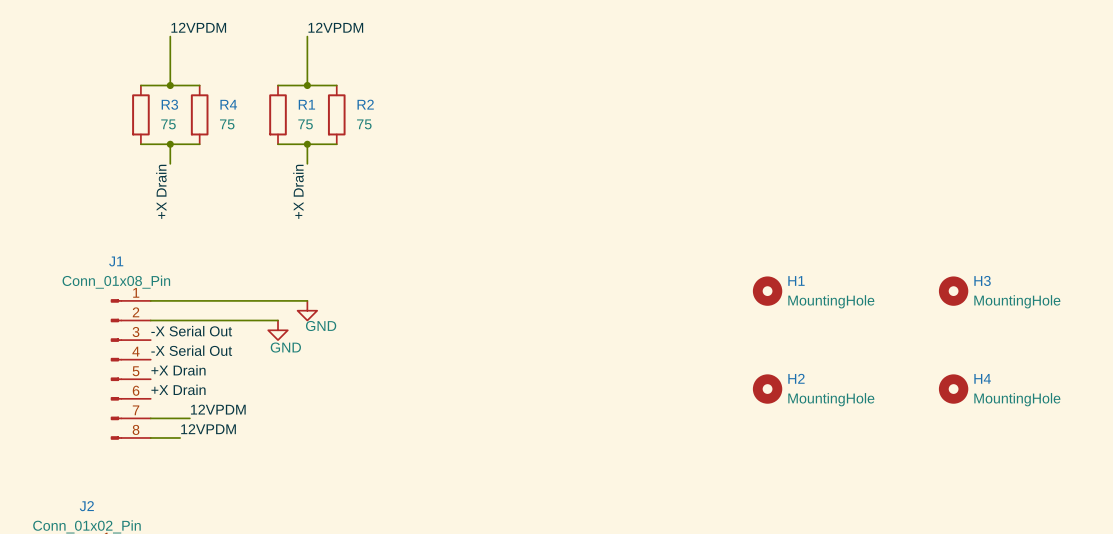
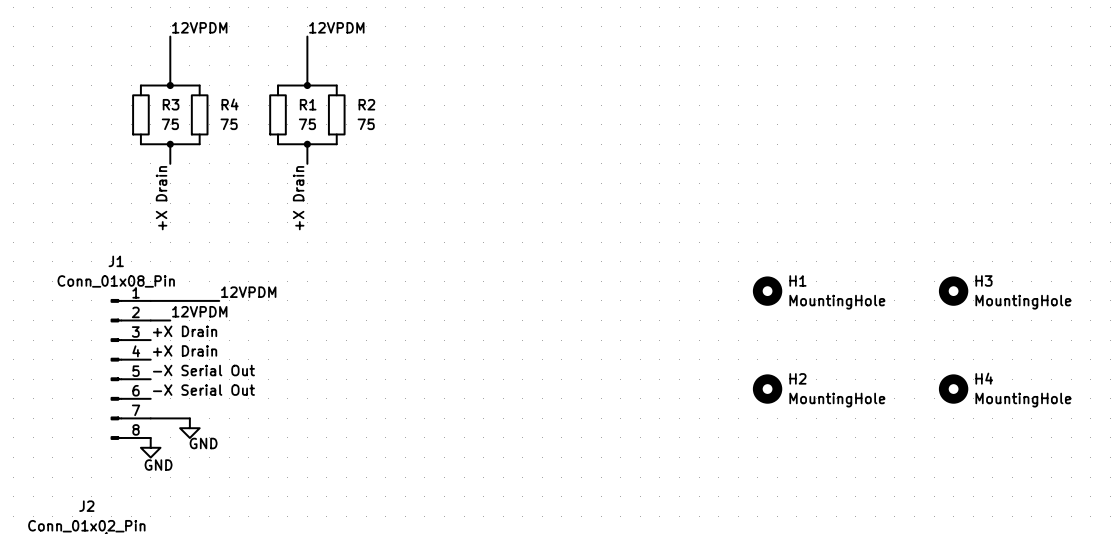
label: none -> 12VPDM (248, 292)
wire: (219, 300) (307, 300) -> none
power symbol: GND (307, 310) -> none
label: none -> 12VPDM (199, 311)
wire: (170, 320) (278, 320) -> none
power symbol: GND (278, 330) -> none
label: -X Serial Out (191, 331) -> +X Drain (185, 331)
label: -X Serial Out (191, 350) -> +X Drain (185, 350)
label: +X Drain (178, 370) -> -X Serial Out (203, 370)
label: +X Drain (178, 389) -> -X Serial Out (203, 390)
label: 12VPDM (218, 409) -> none
power symbol: none -> GND (189, 428)
label: 12VPDM (208, 429) -> none
wire: (150, 437) (180, 437) -> none
power symbol: none -> GND (150, 447)

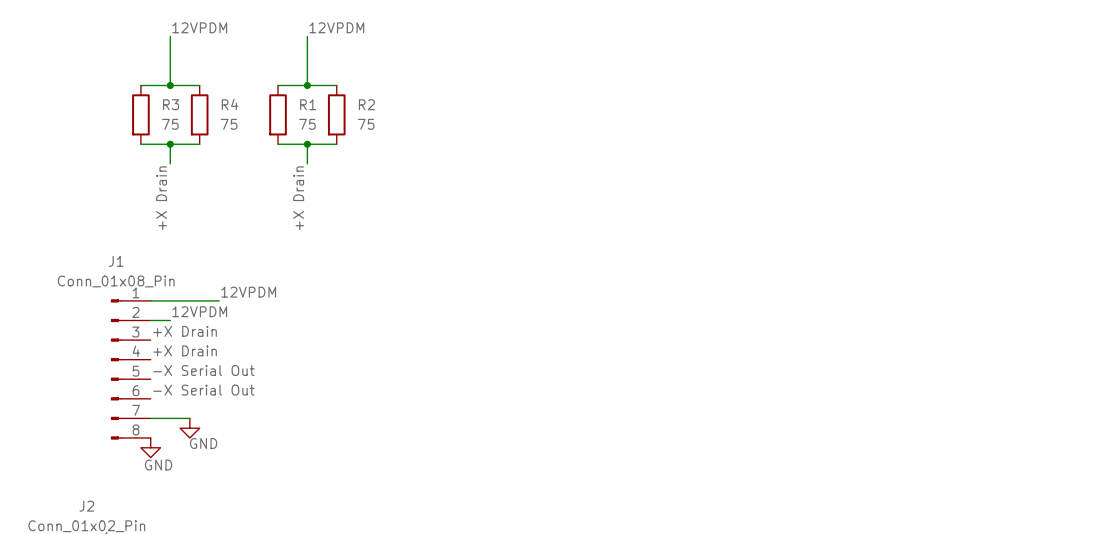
H1: MountingHole (767, 291) -> none
H3: MountingHole (953, 291) -> none
H2: MountingHole (767, 389) -> none
H4: MountingHole (953, 389) -> none

